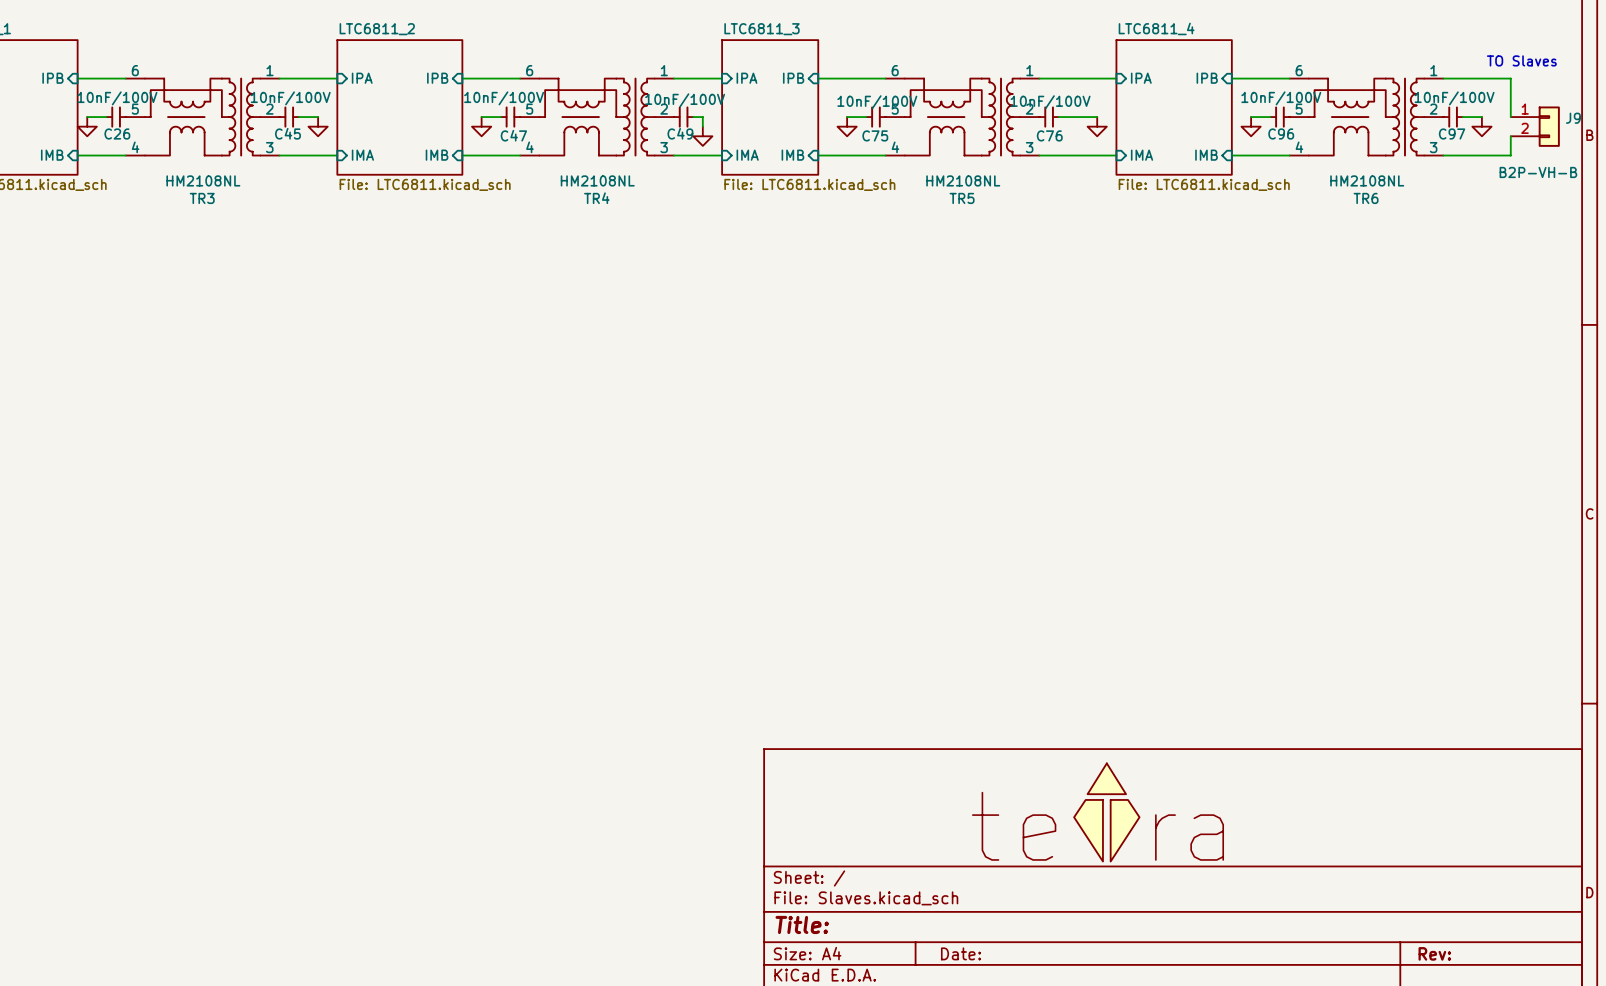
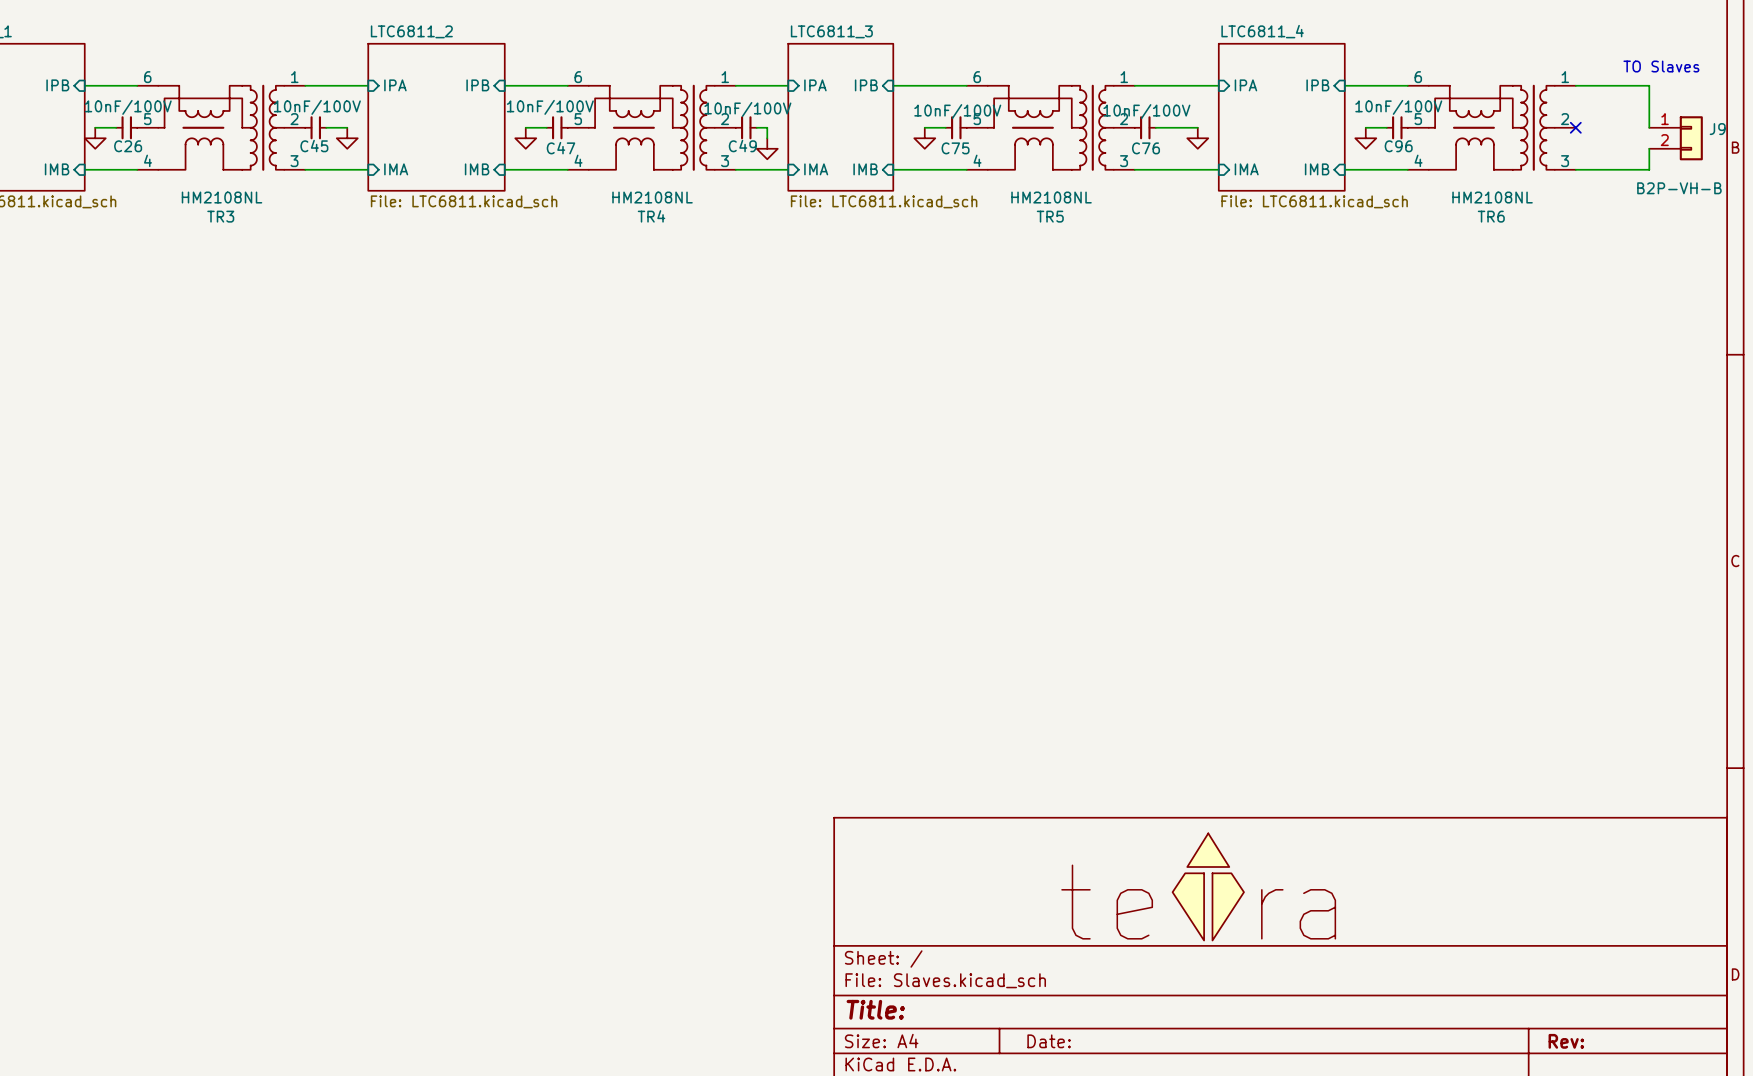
no-connect mark: none -> (1575, 127)
C97: 10nF/100V (1453, 117) -> none
wire: (1462, 117) (1481, 117) -> none
power symbol: (1481, 126) -> none

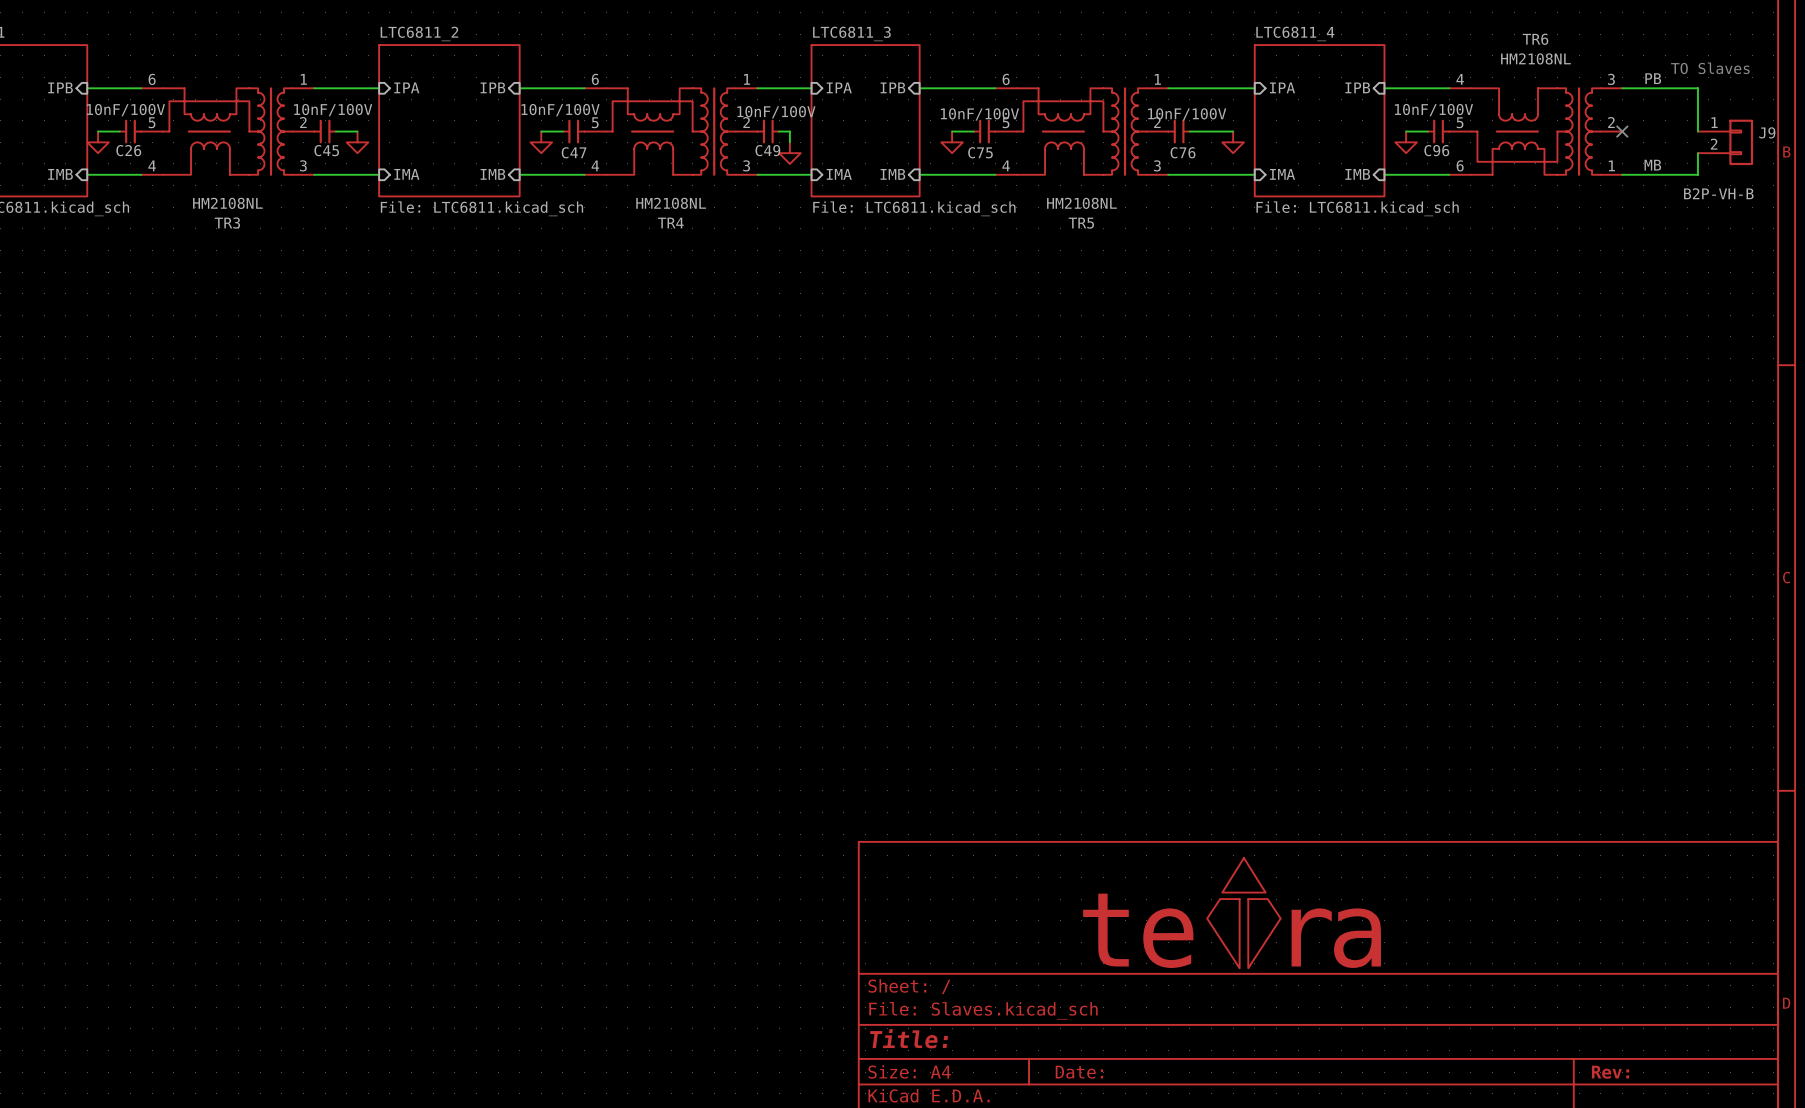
label: none -> PB (1653, 78)
TR6 flip: as is (1491, 127) -> up-down (1535, 131)
label: none -> MB (1652, 165)

